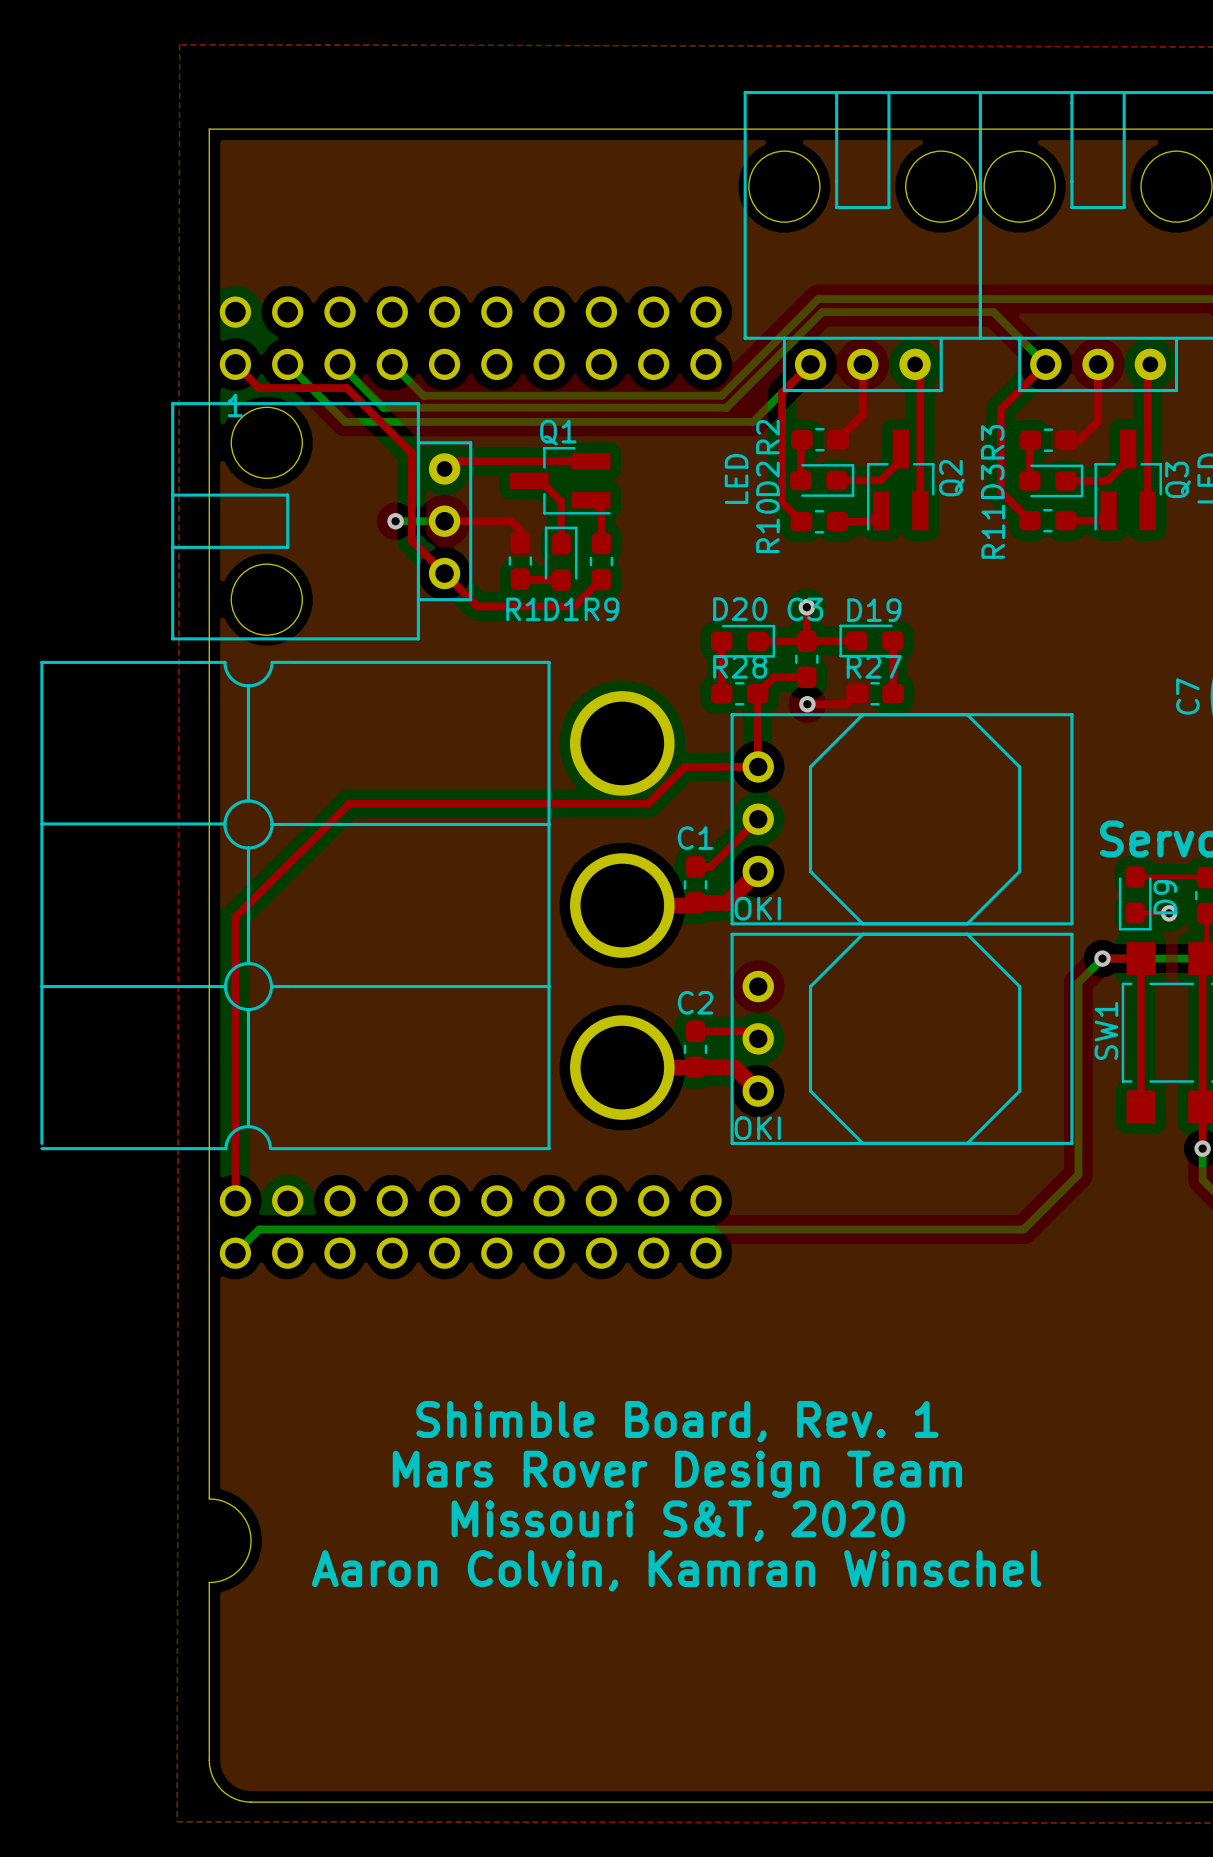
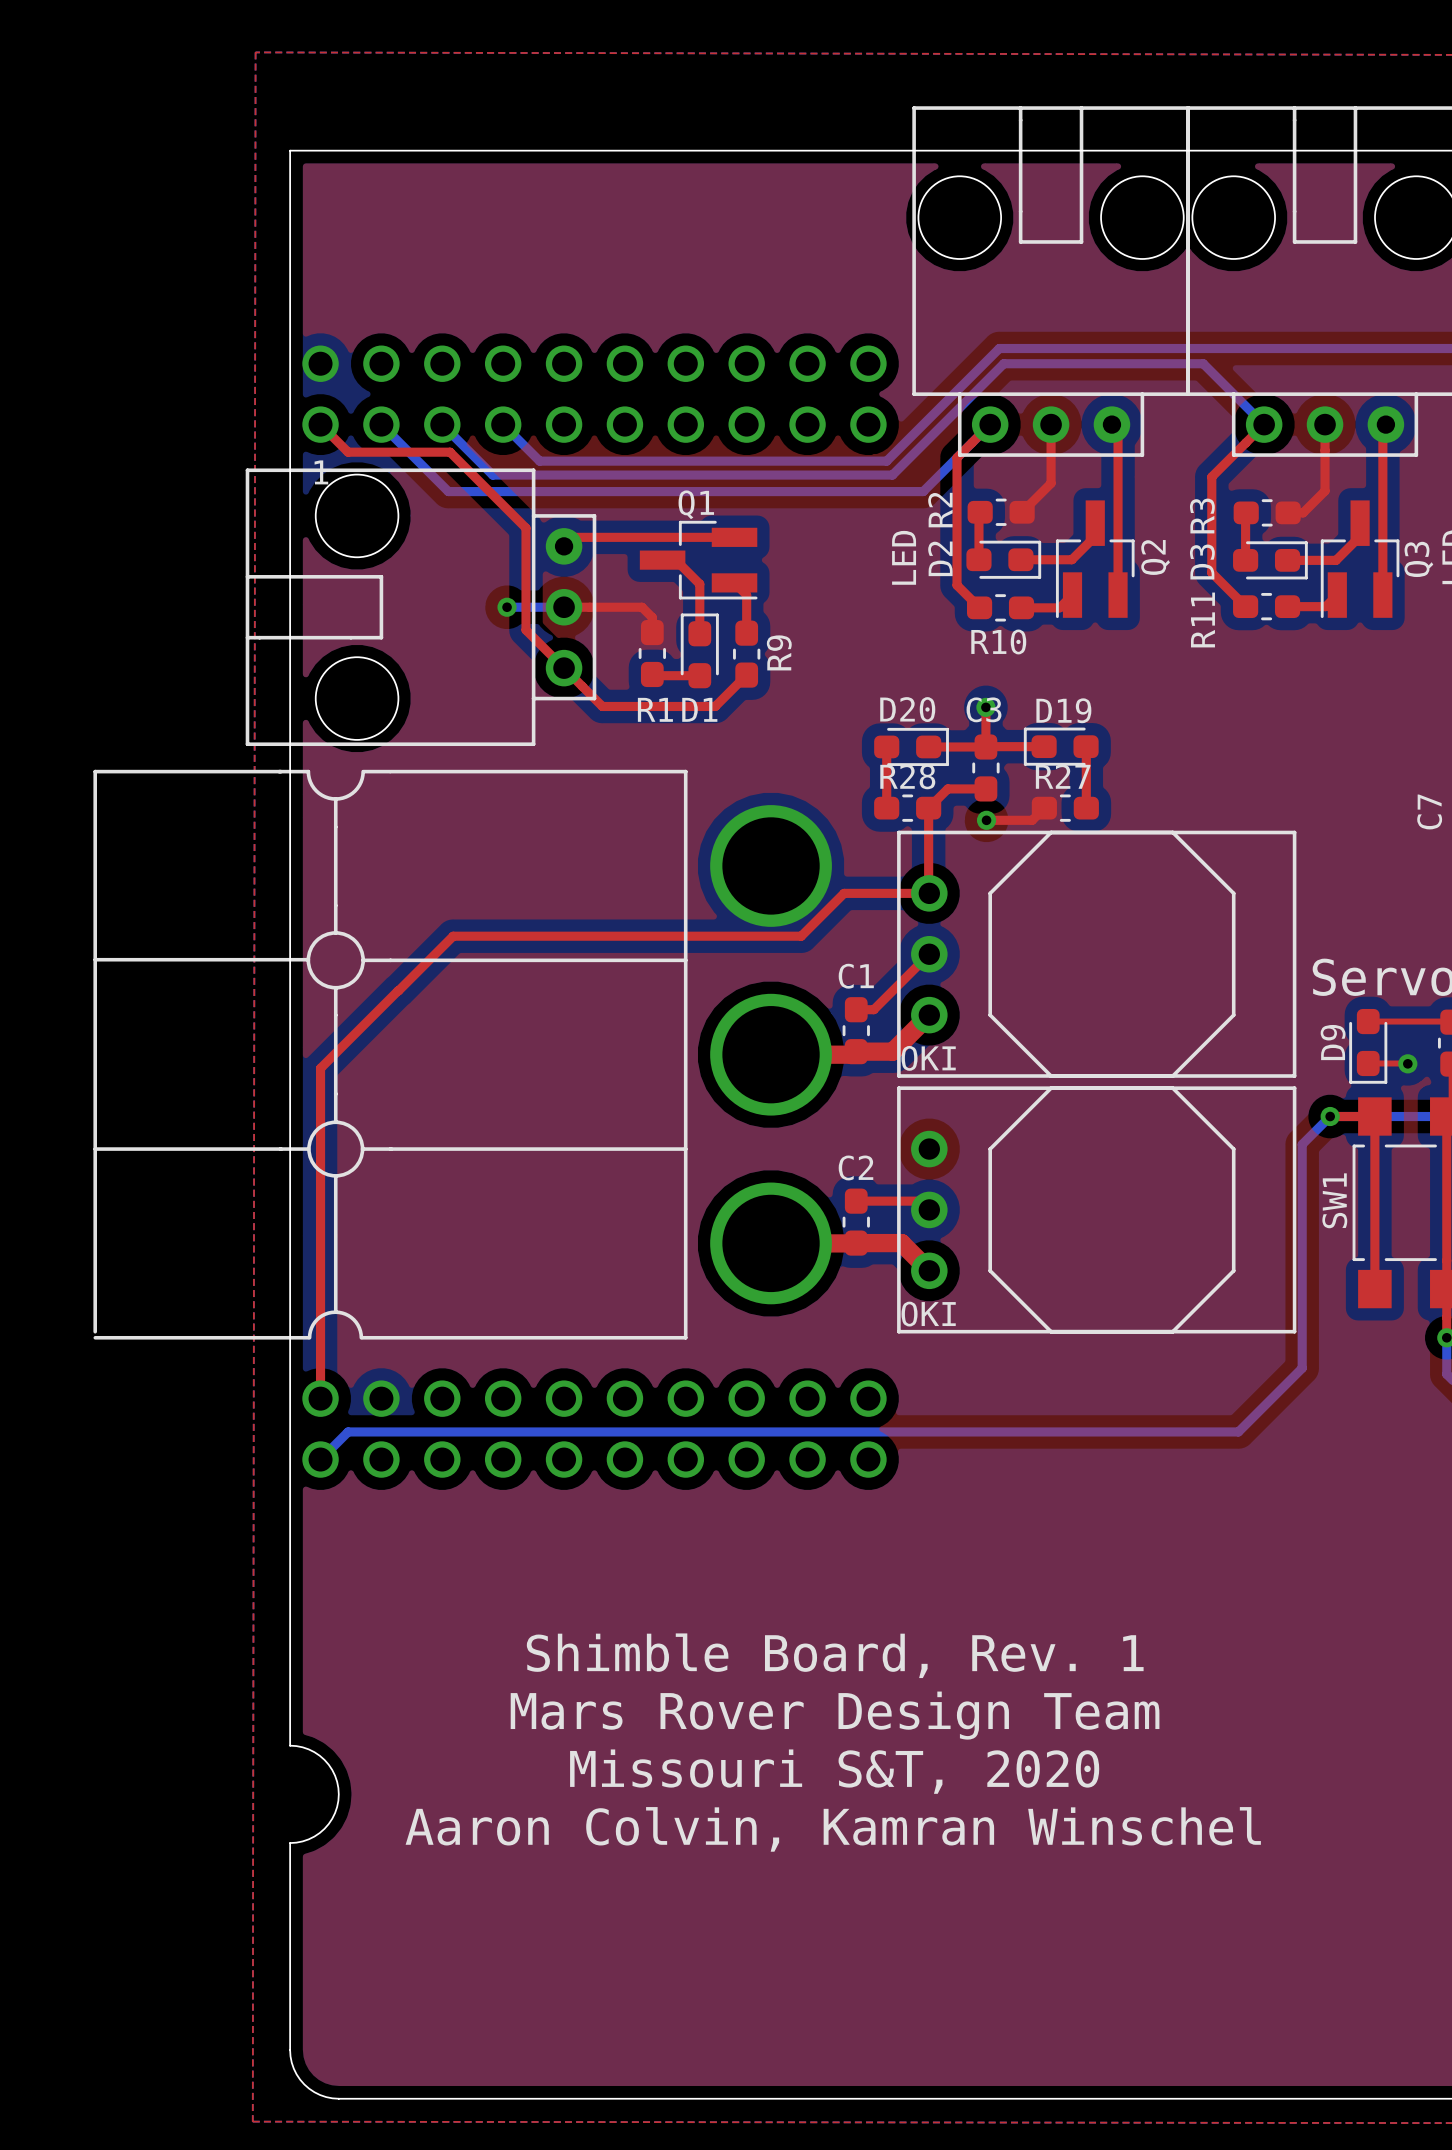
R10 name rotation: 0° (767, 525) -> 90° clockwise (998, 641)
R9 name rotation: 0° (601, 609) -> 90° counterclockwise (779, 652)
R9 name position: R9 (601, 609) -> R9 (779, 652)
D9 name position: D9 (1165, 897) -> D9 (1333, 1042)

